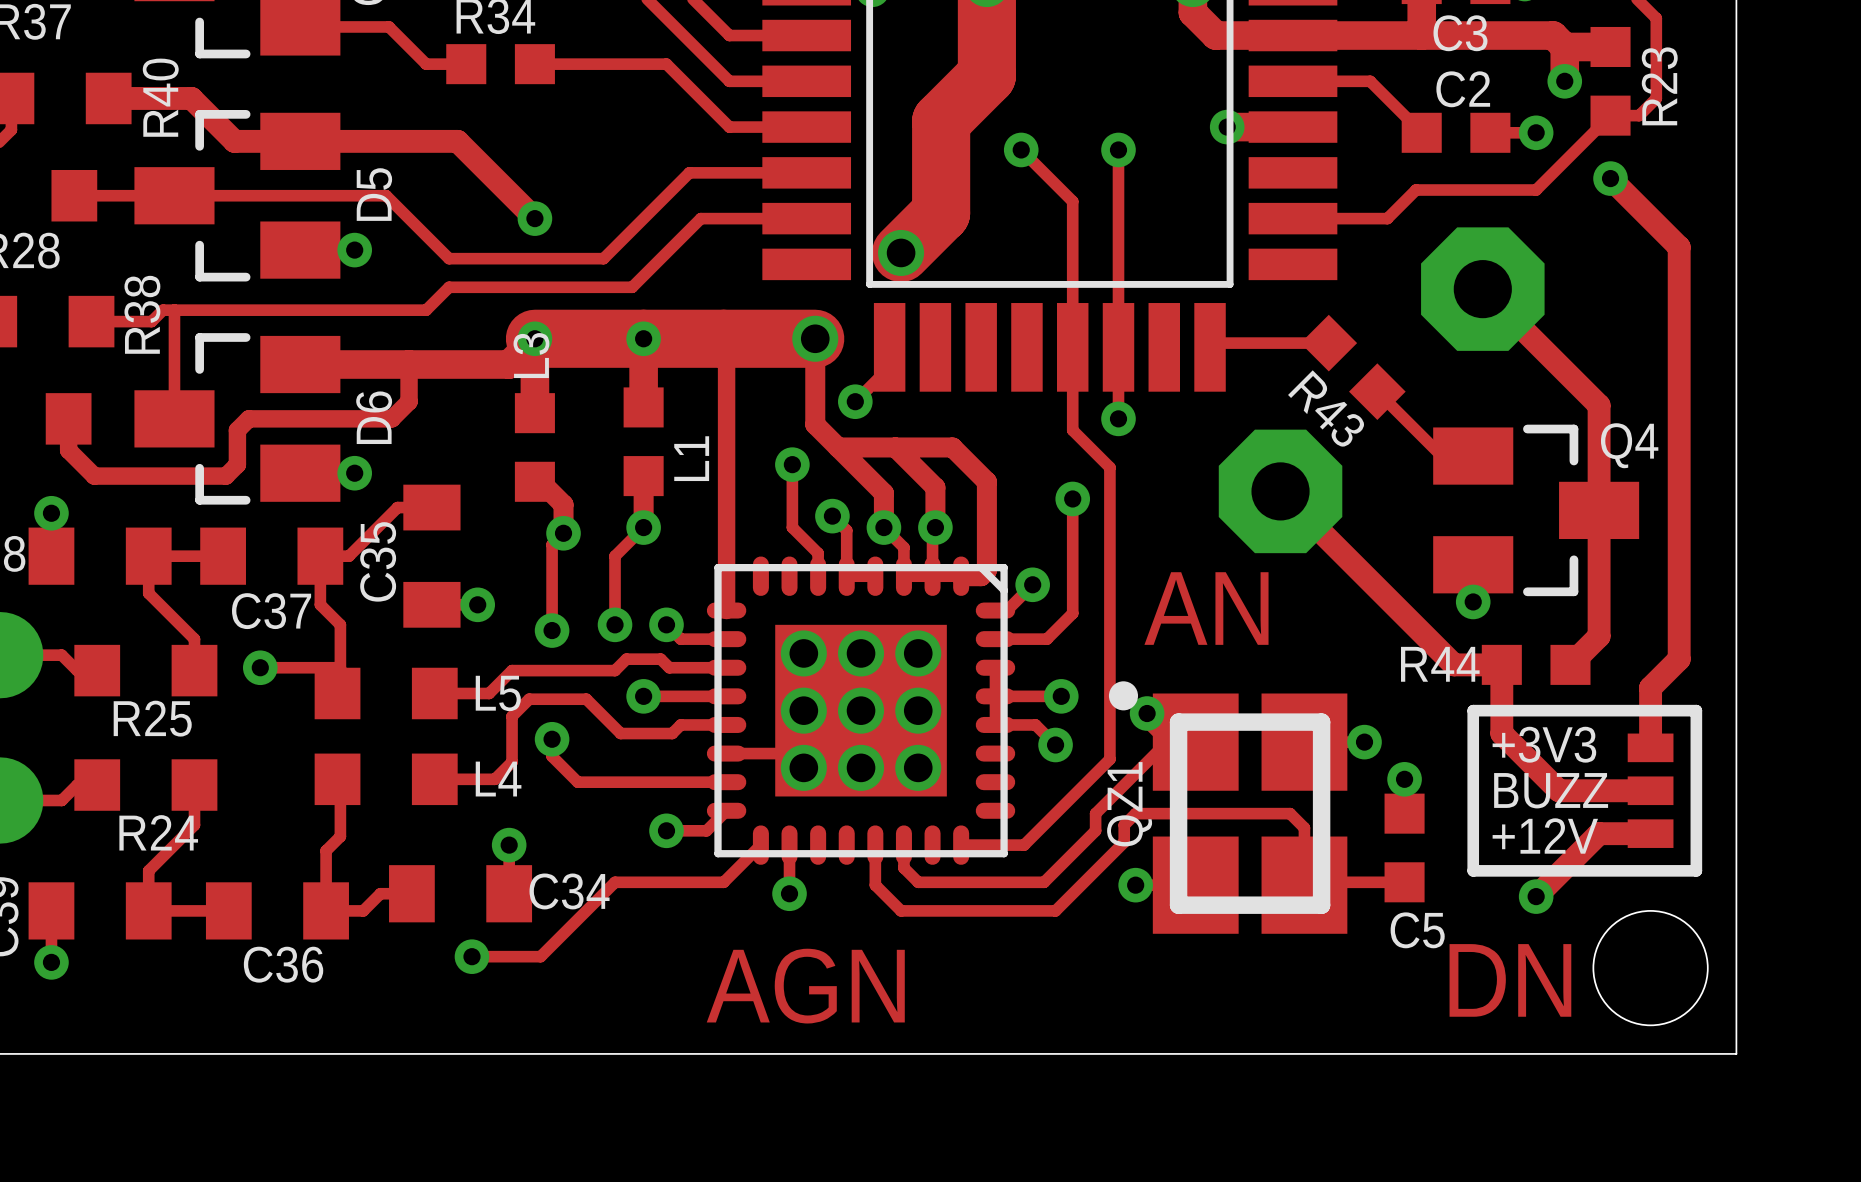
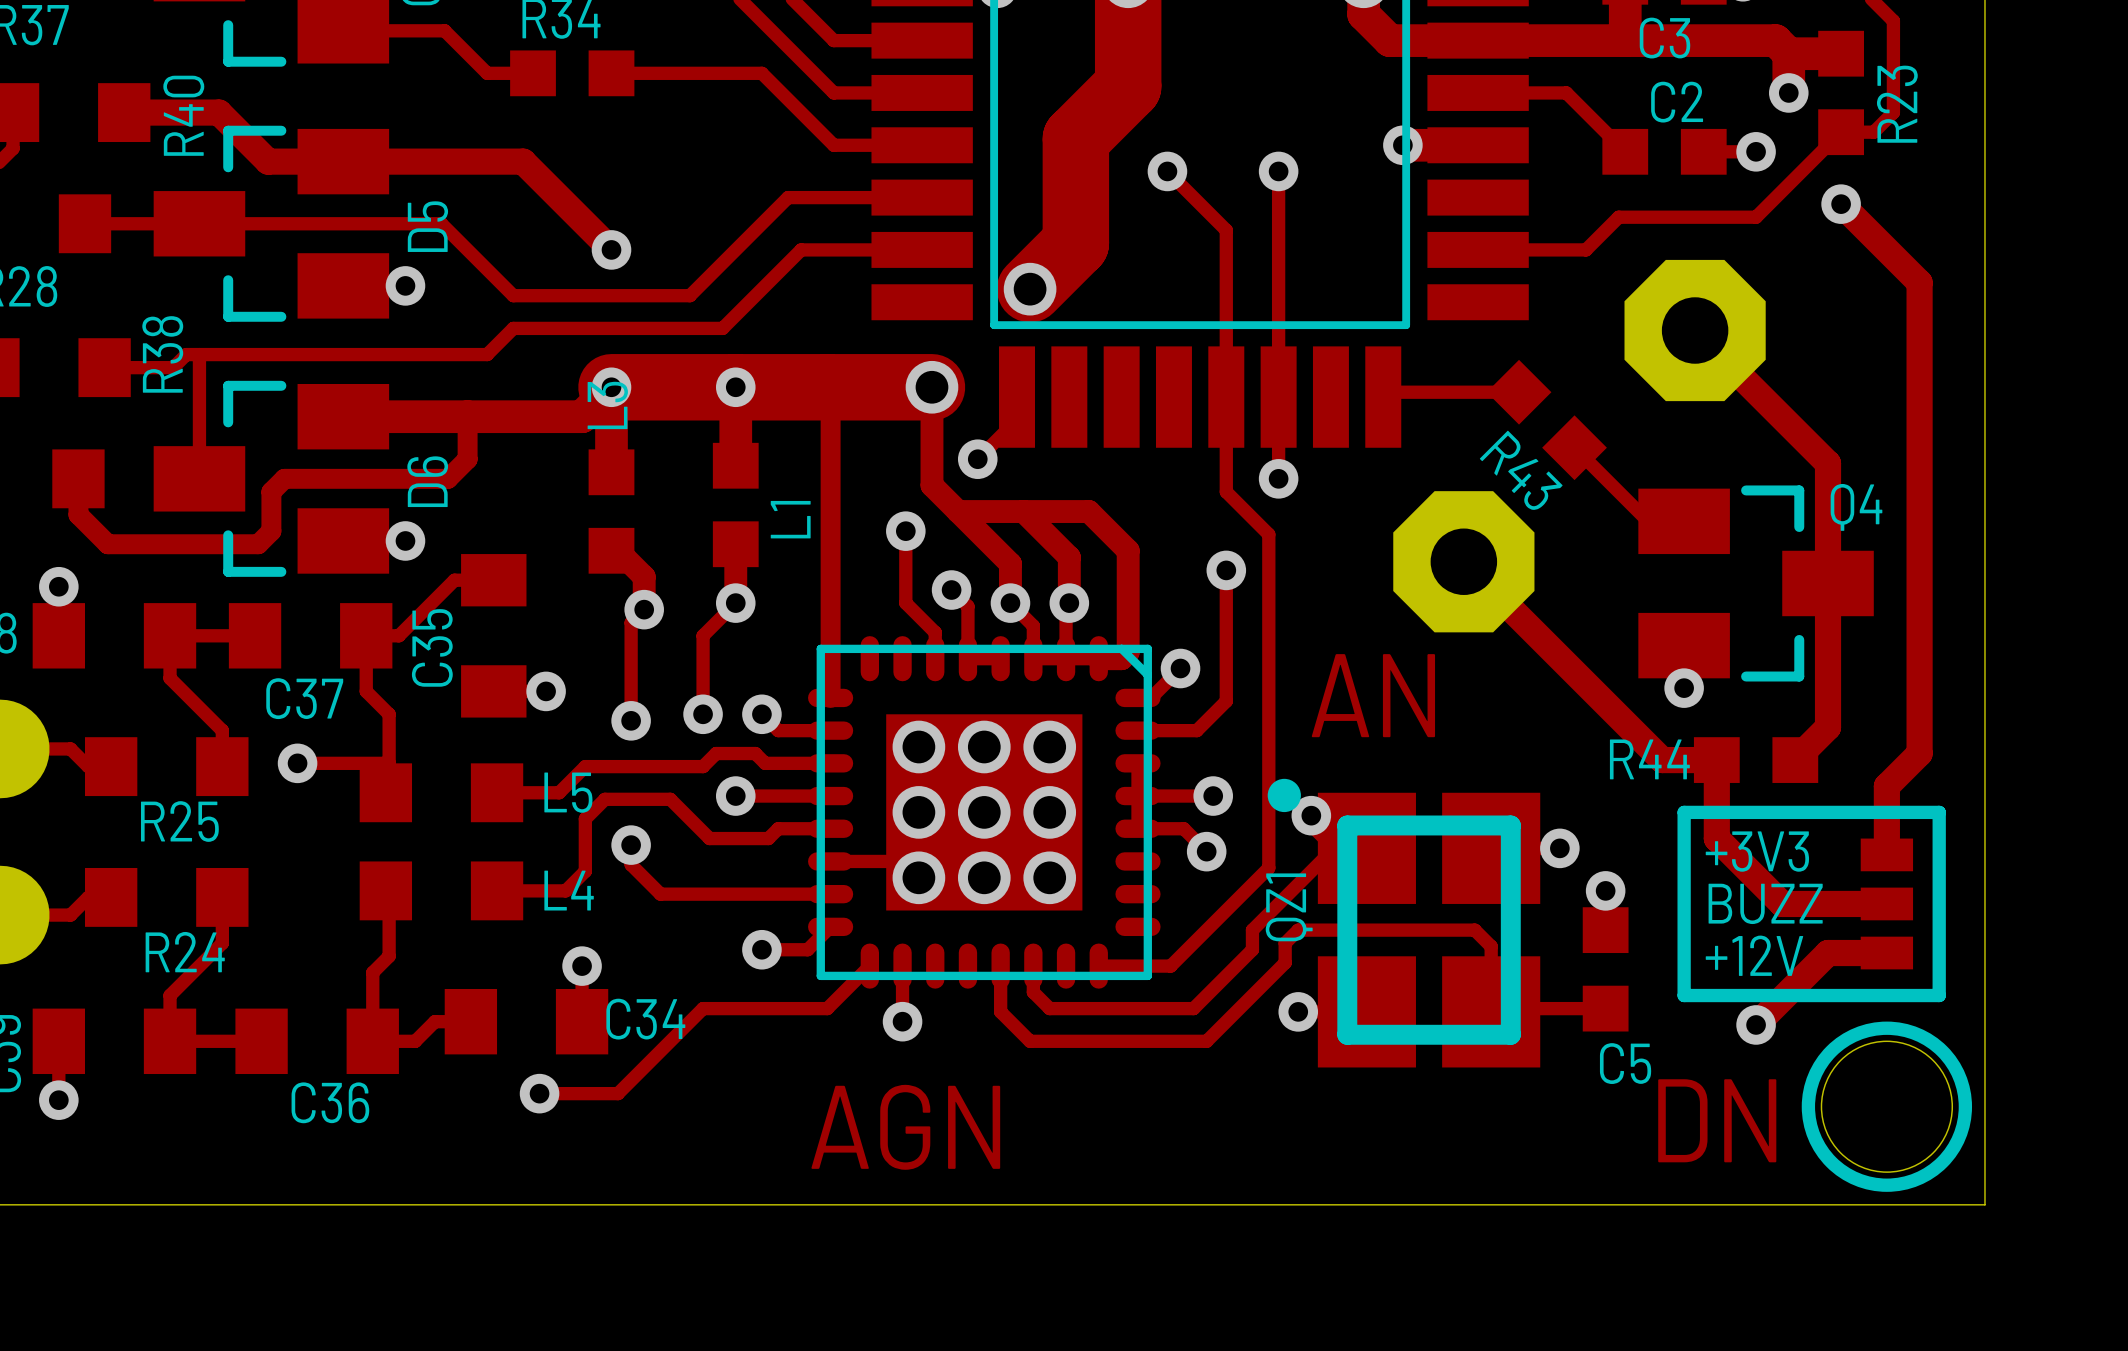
drawing: none -> [1801, 1021, 1973, 1192]

